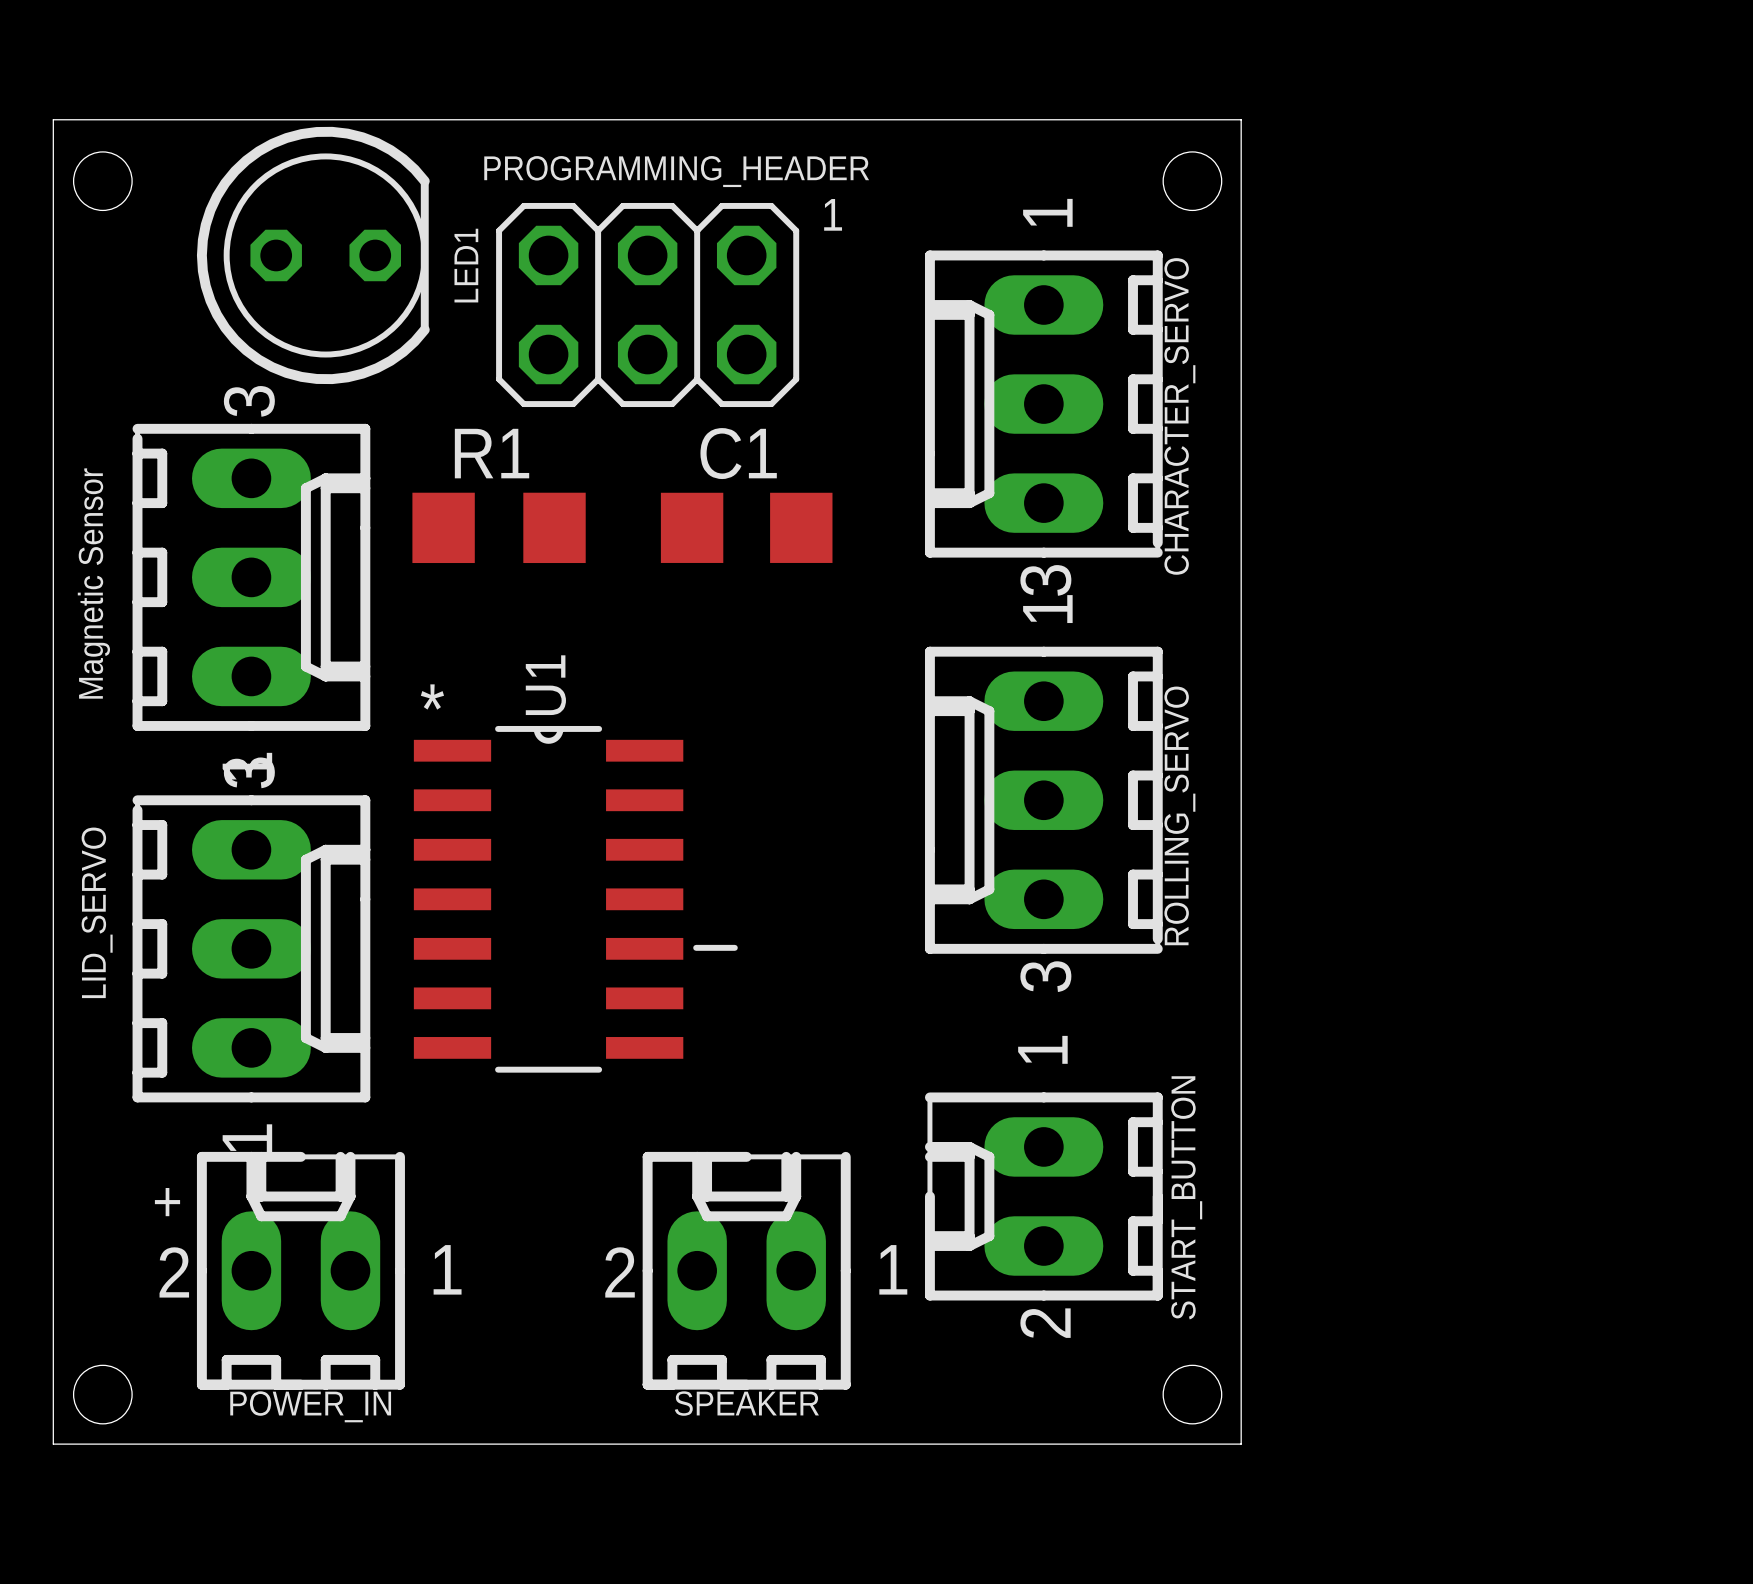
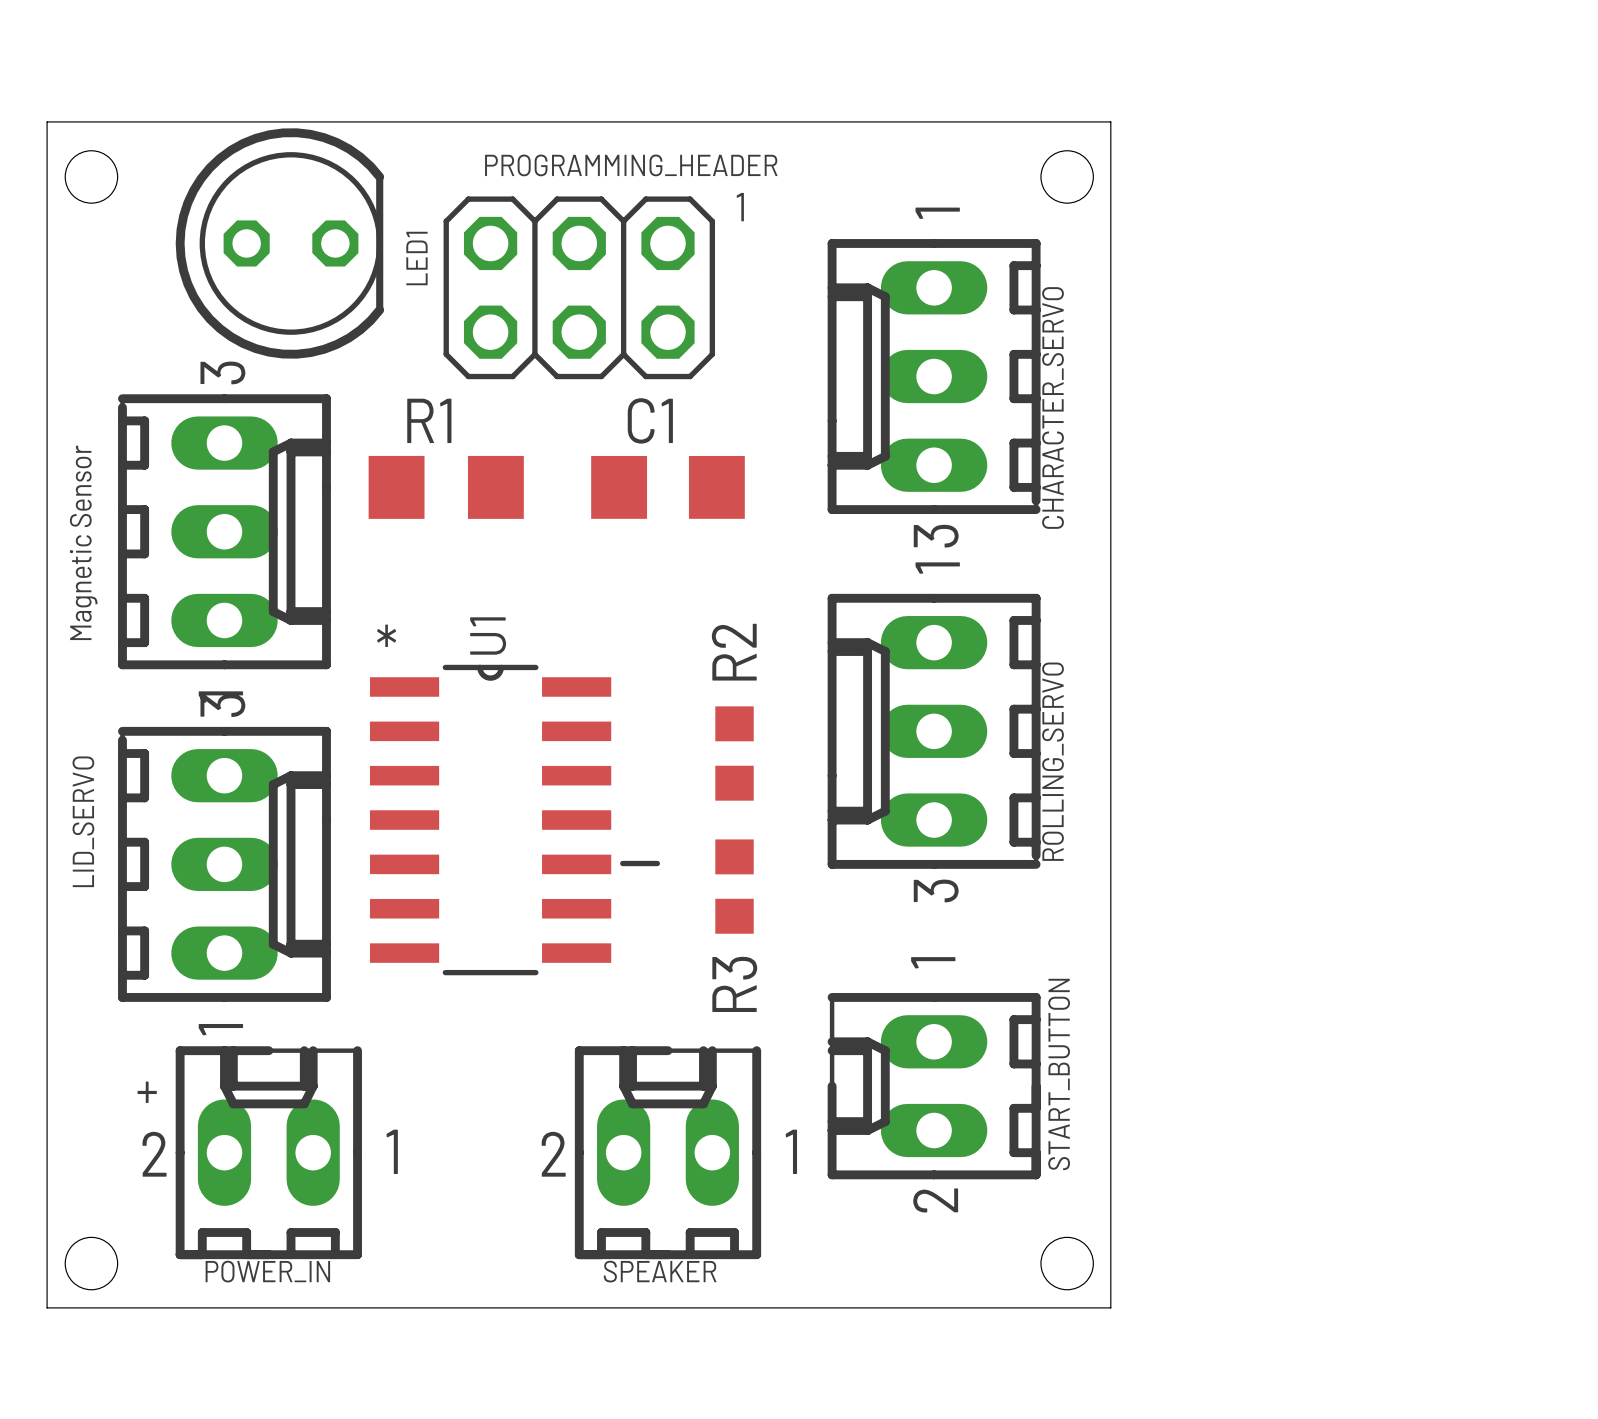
R2: none -> (734, 753)
R3: none -> (734, 886)

